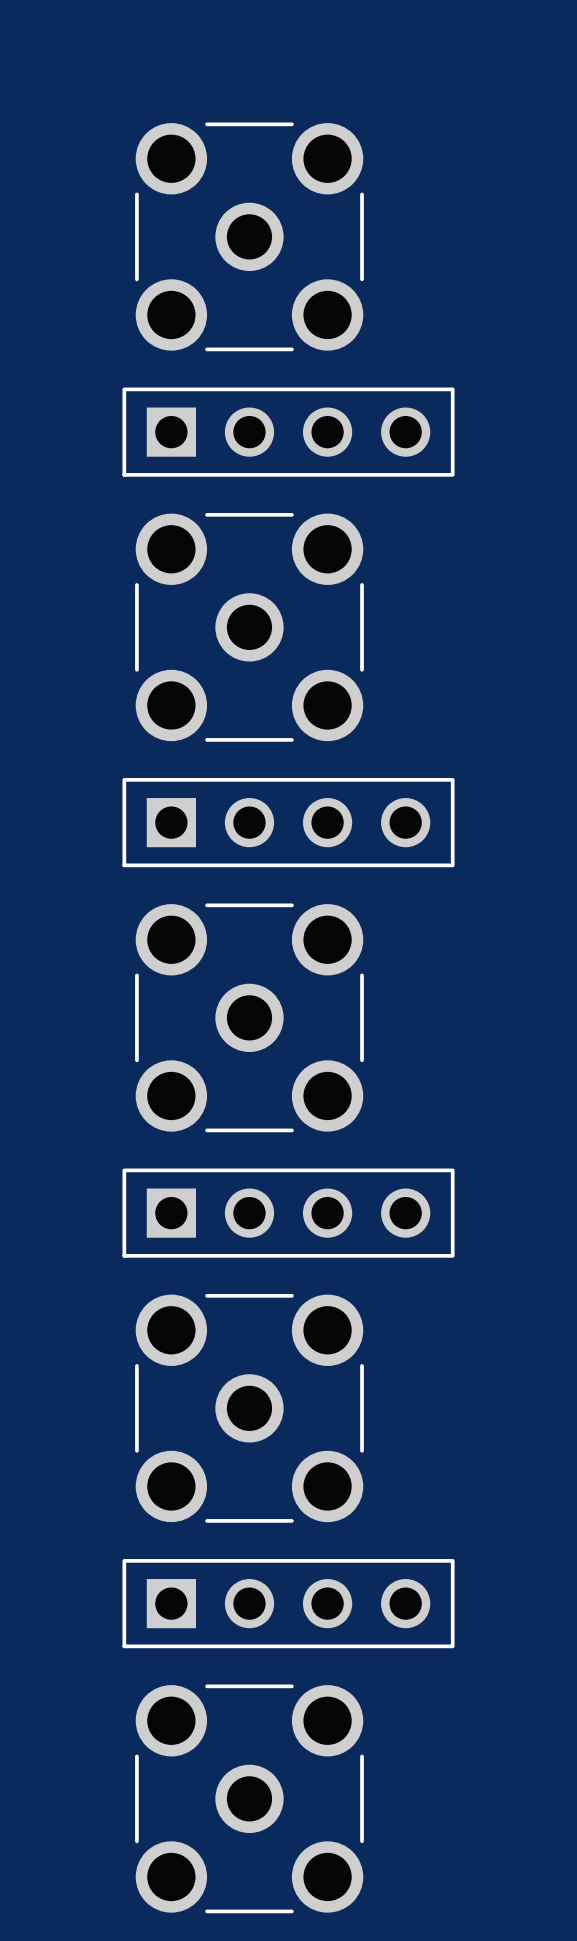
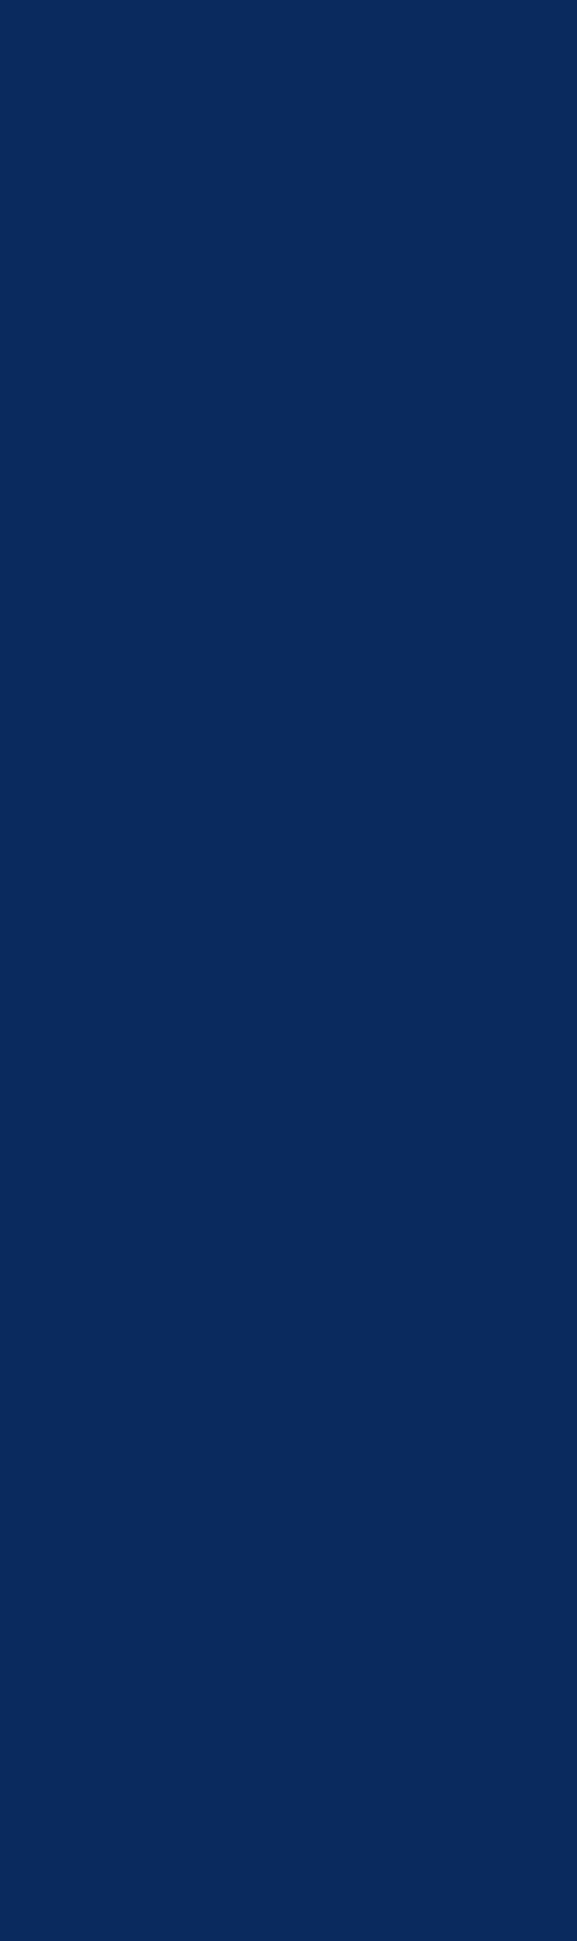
part: (249, 236) -> none
part: (288, 432) -> none
part: (249, 627) -> none
part: (288, 822) -> none
part: (249, 1017) -> none
part: (288, 1213) -> none
part: (249, 1408) -> none
part: (288, 1603) -> none
part: (249, 1798) -> none

